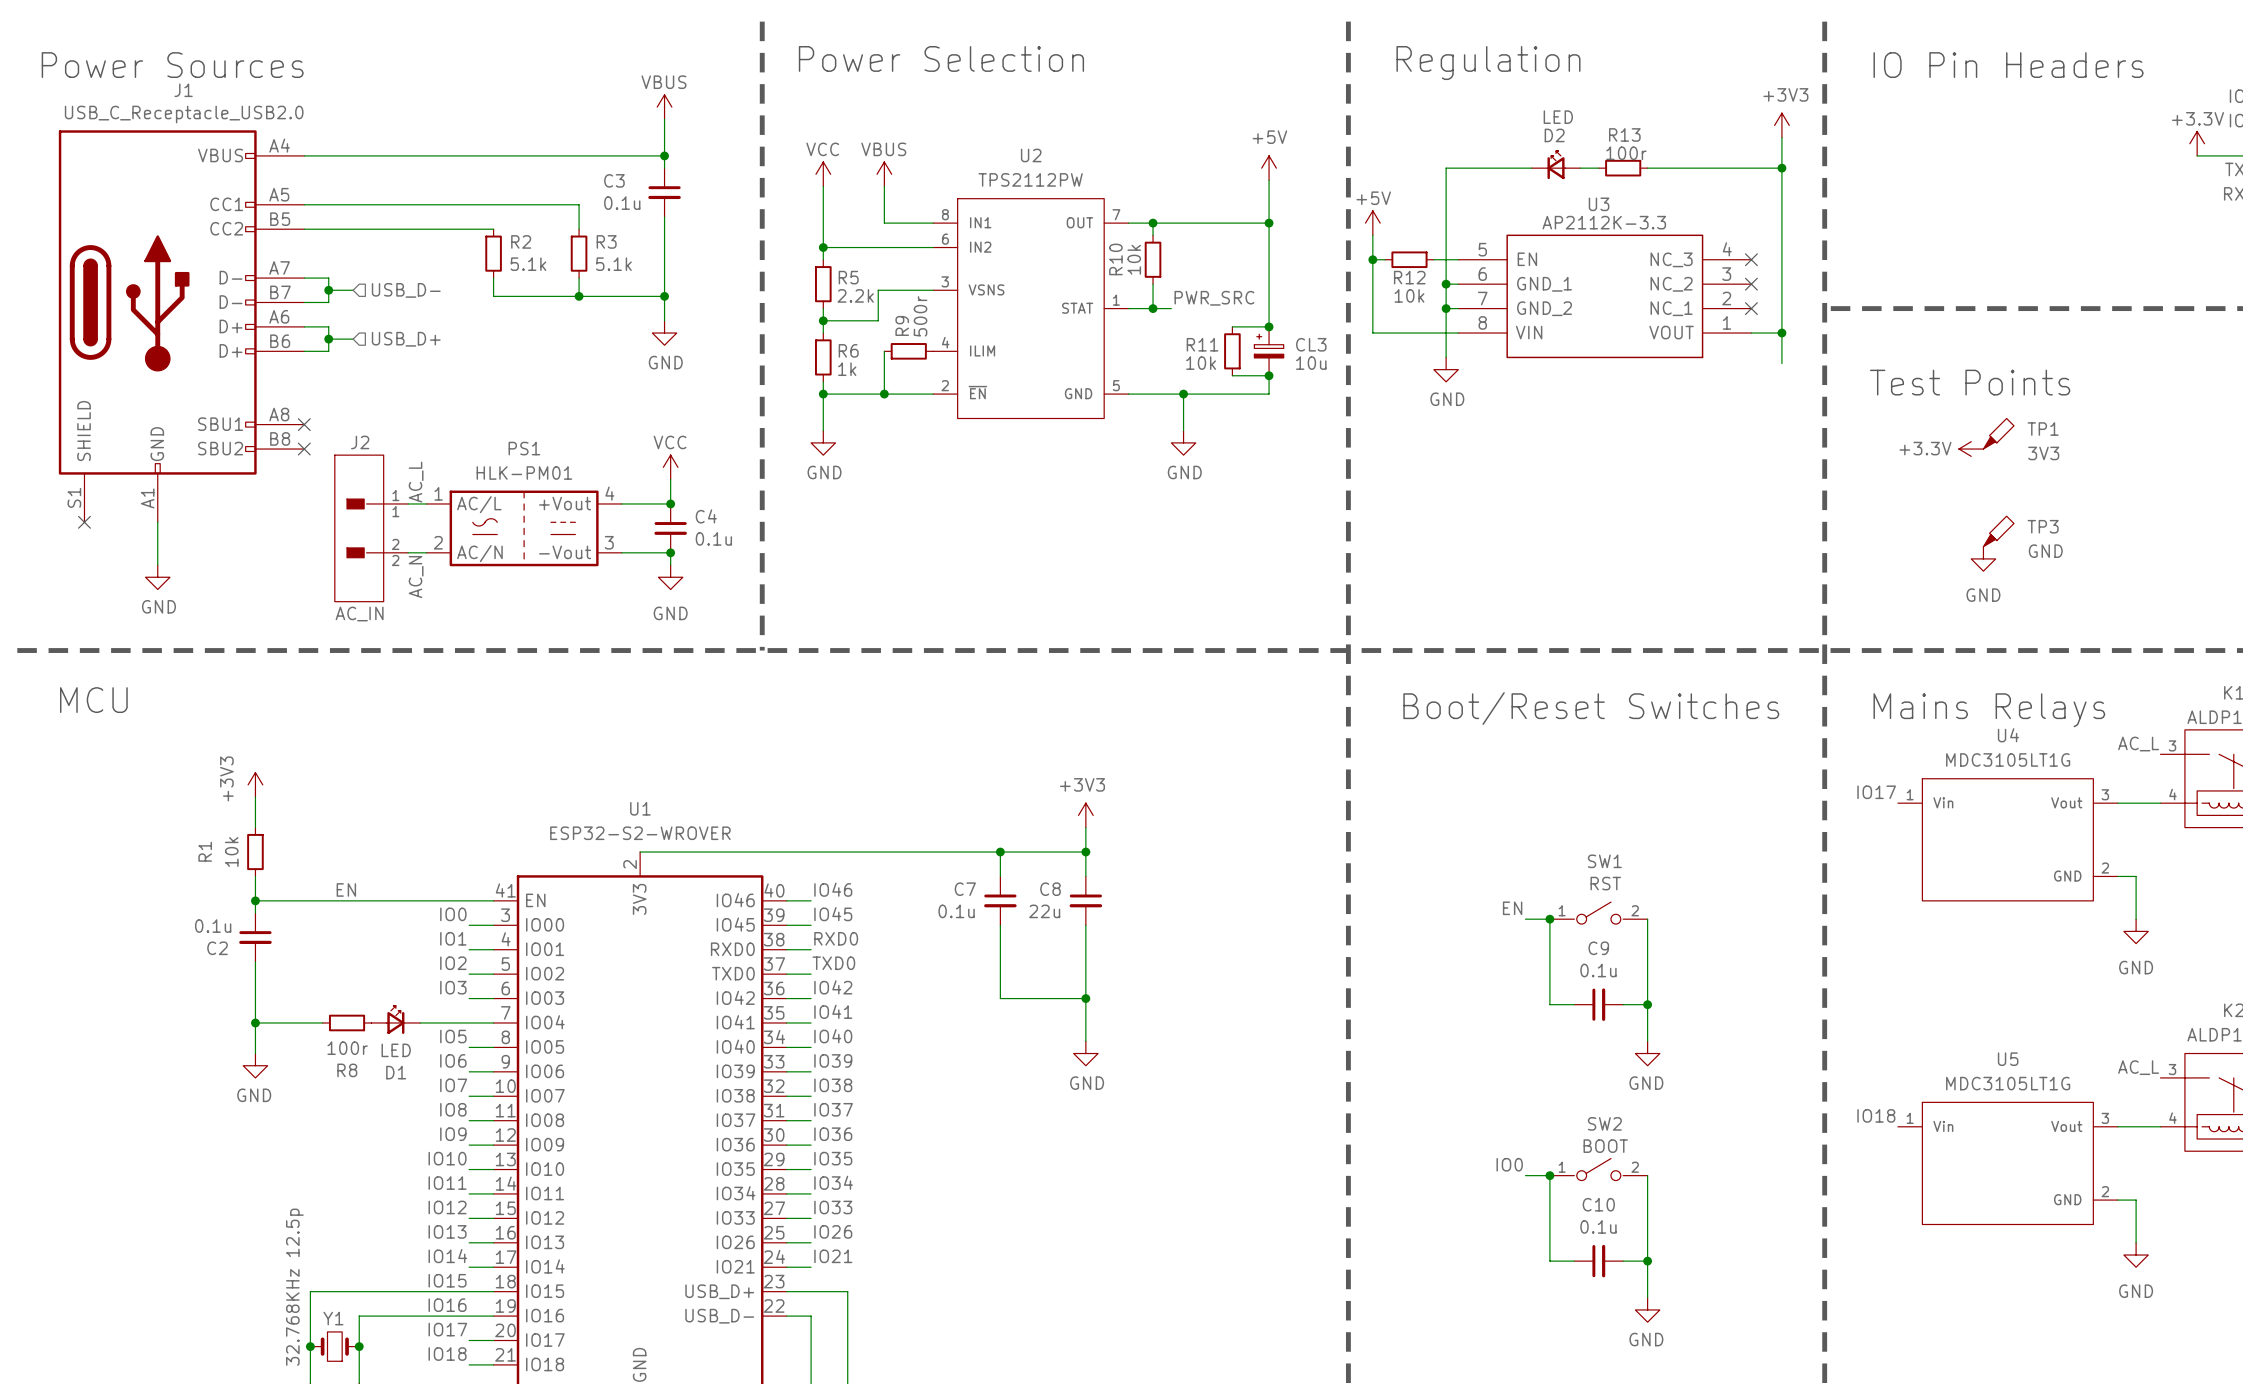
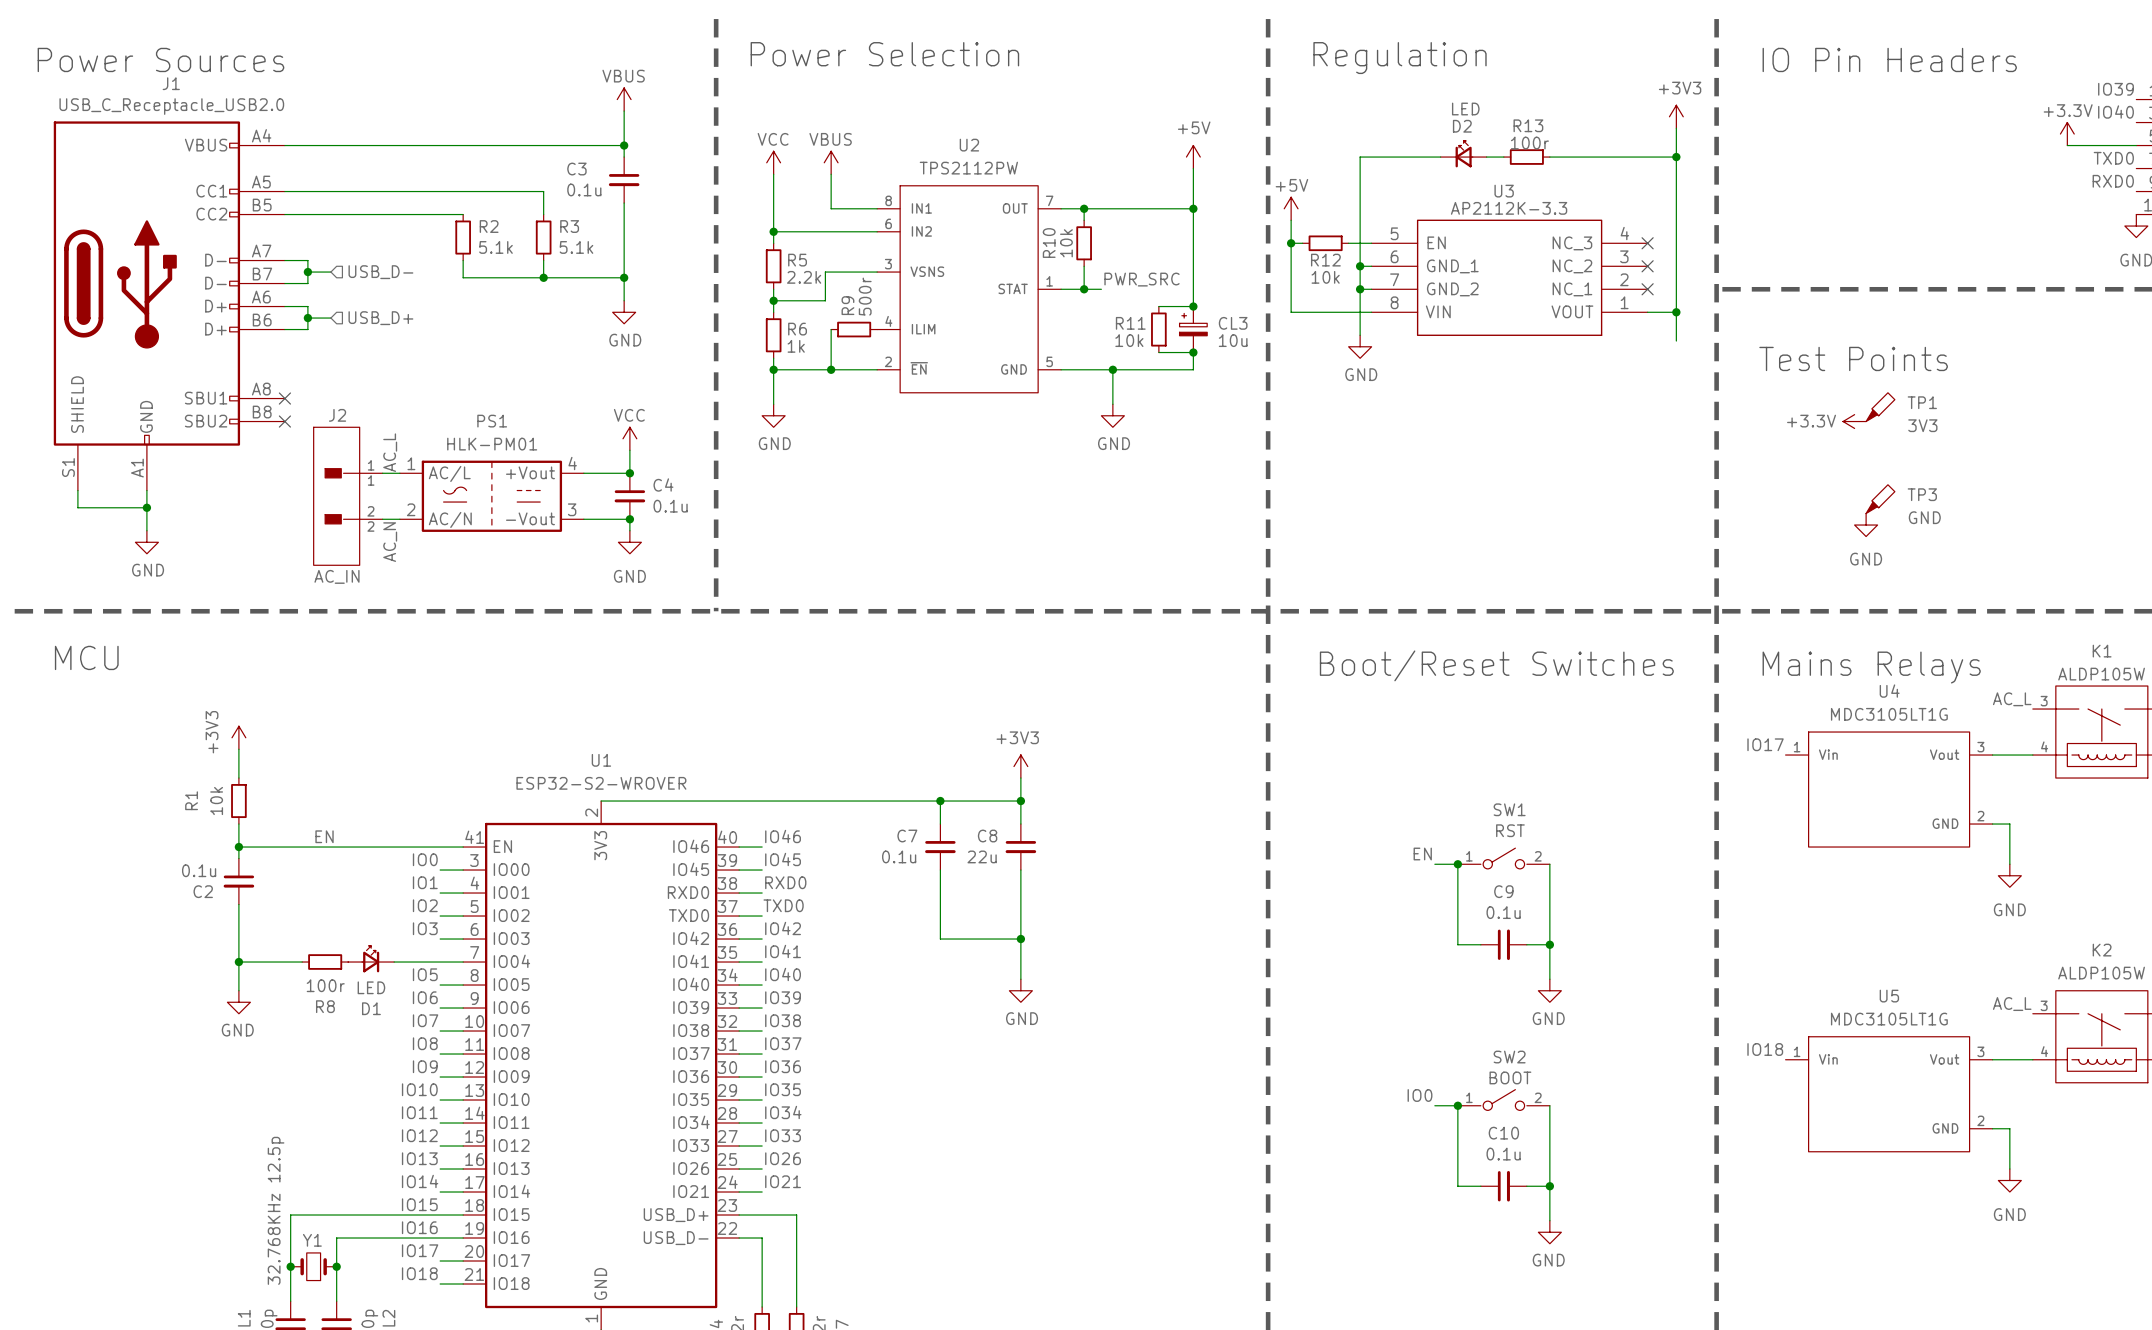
wire: none -> (77, 490) (77, 507) (146, 507)
no-connect mark: (84, 522) -> none
junction: none -> (146, 507)

